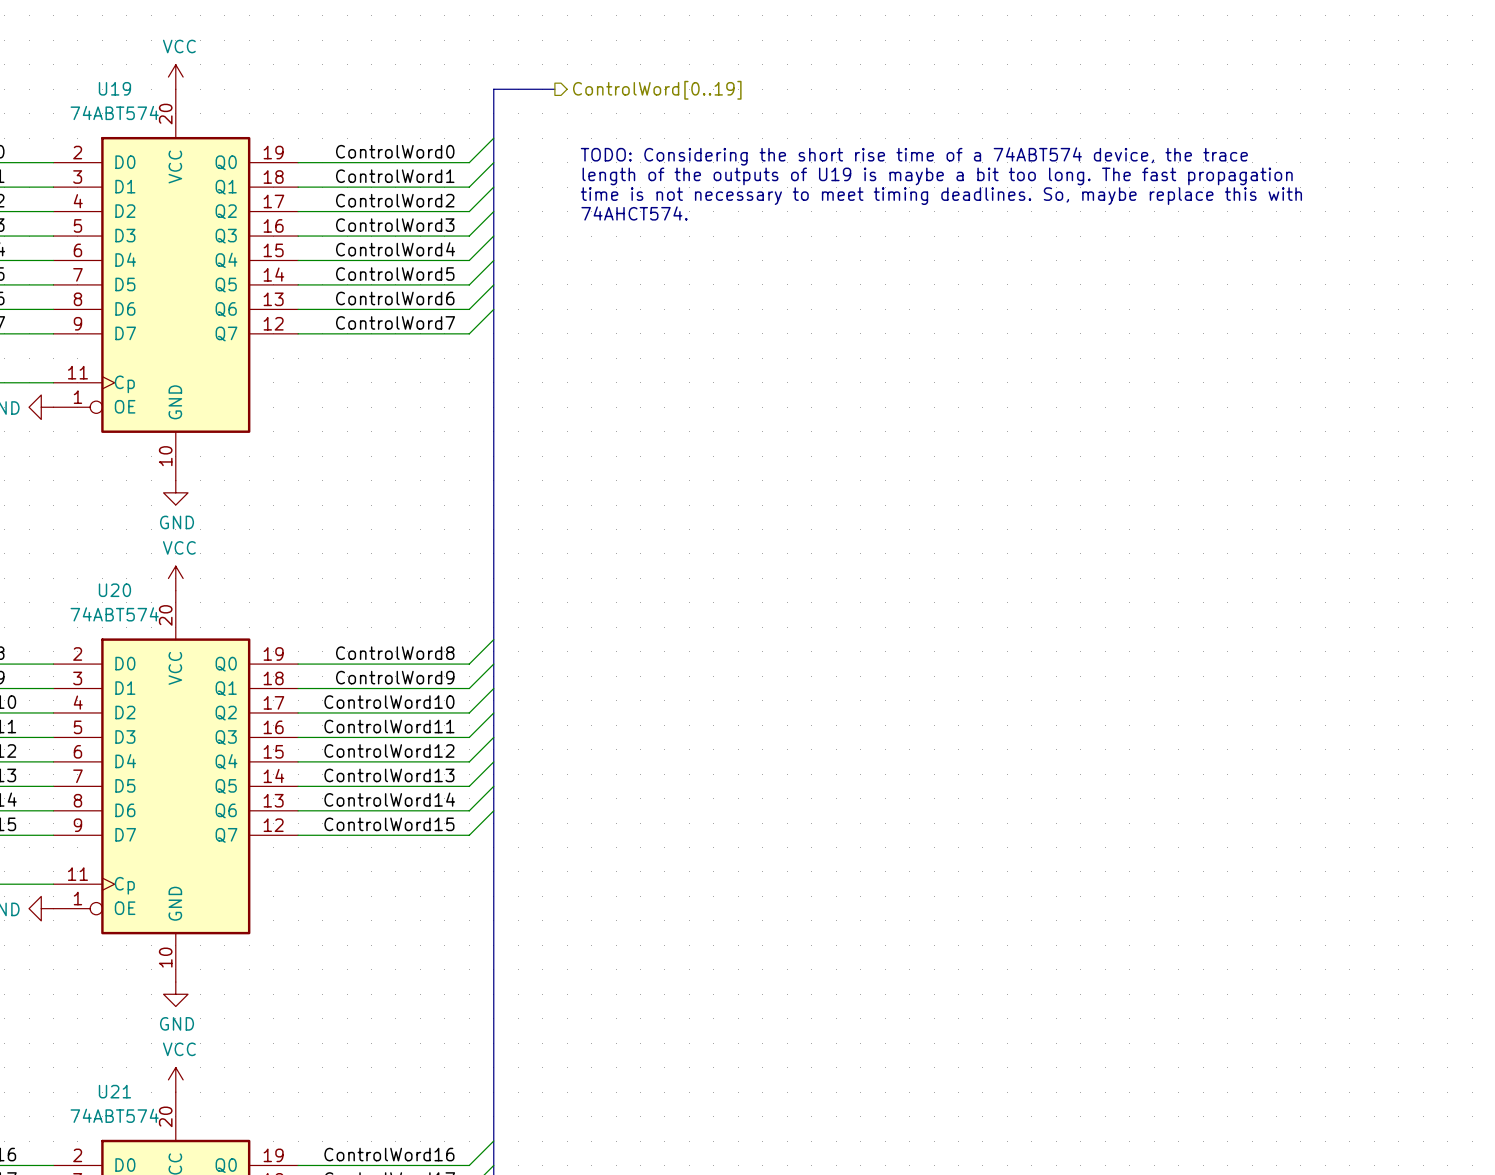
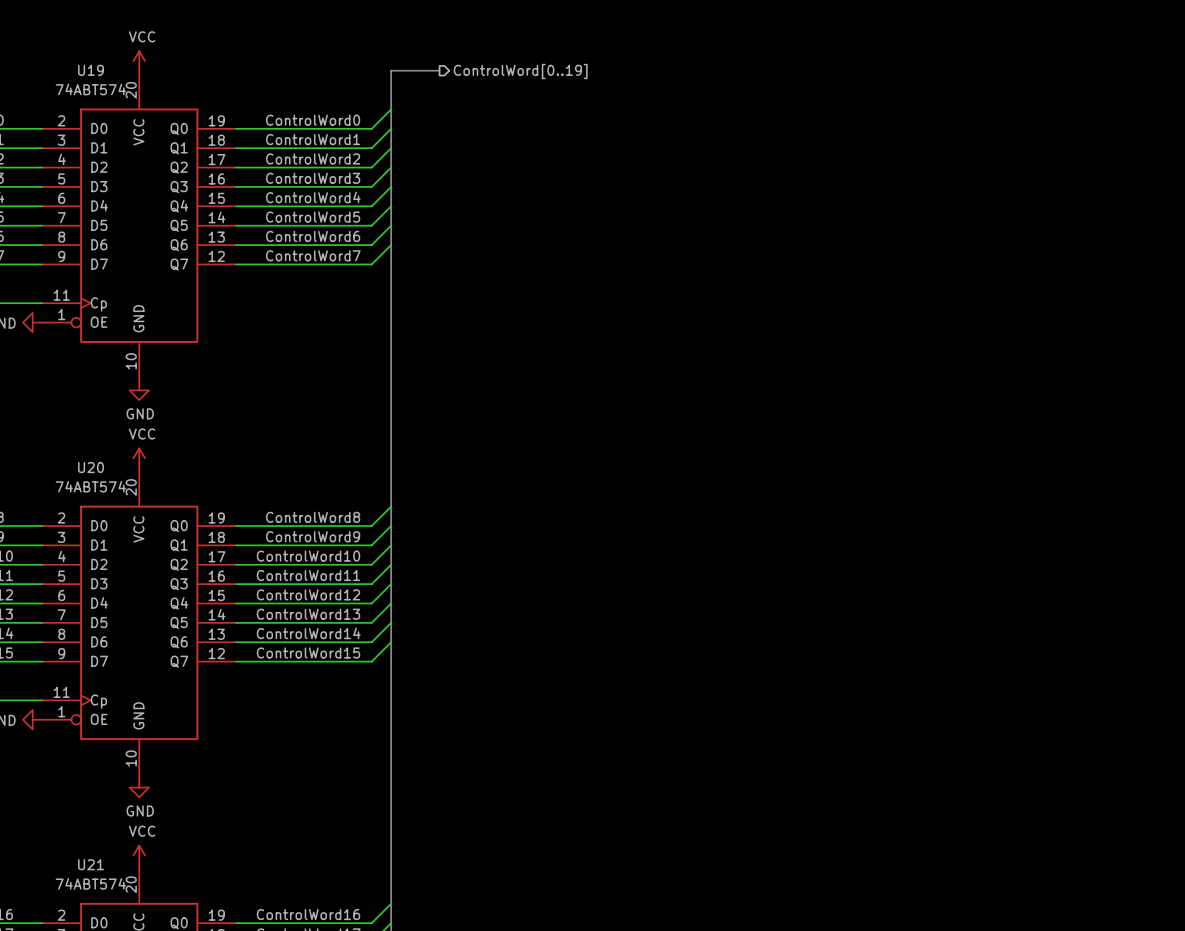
text: TODO: Considering the short rise time of a 74ABT574 device, the trace (914, 156) -> none
text: length of the outputs of U19 is maybe a bit too long. The fast propagation (937, 176) -> none
text: time is not necessary to meet timing deadlines. So, maybe replace this with (941, 196) -> none
text: 74AHCT574. (634, 213) -> none

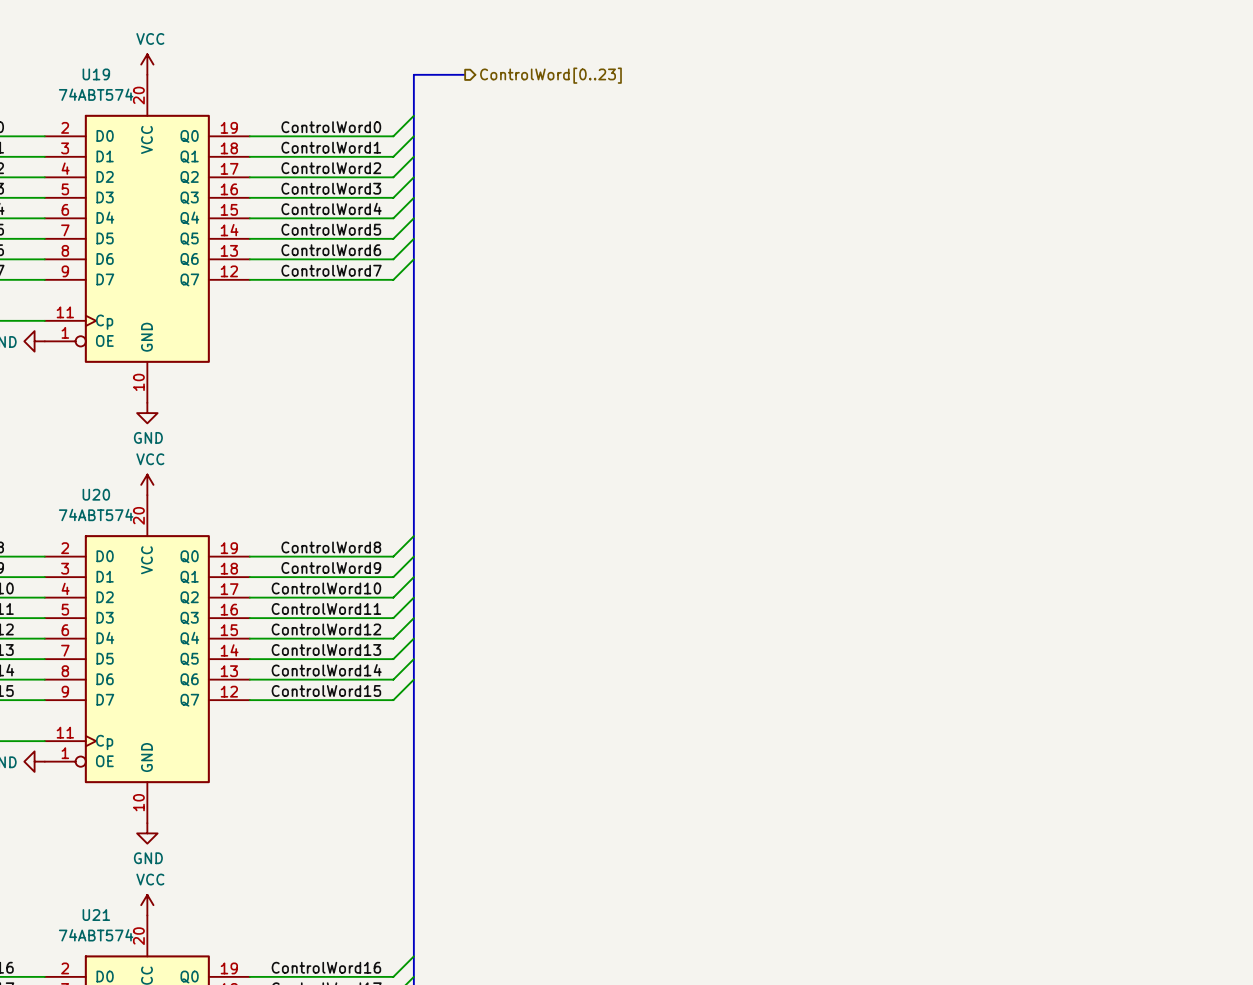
hierarchical label: ControlWord[0..19] (520, 71) -> ControlWord[0..23] (550, 75)

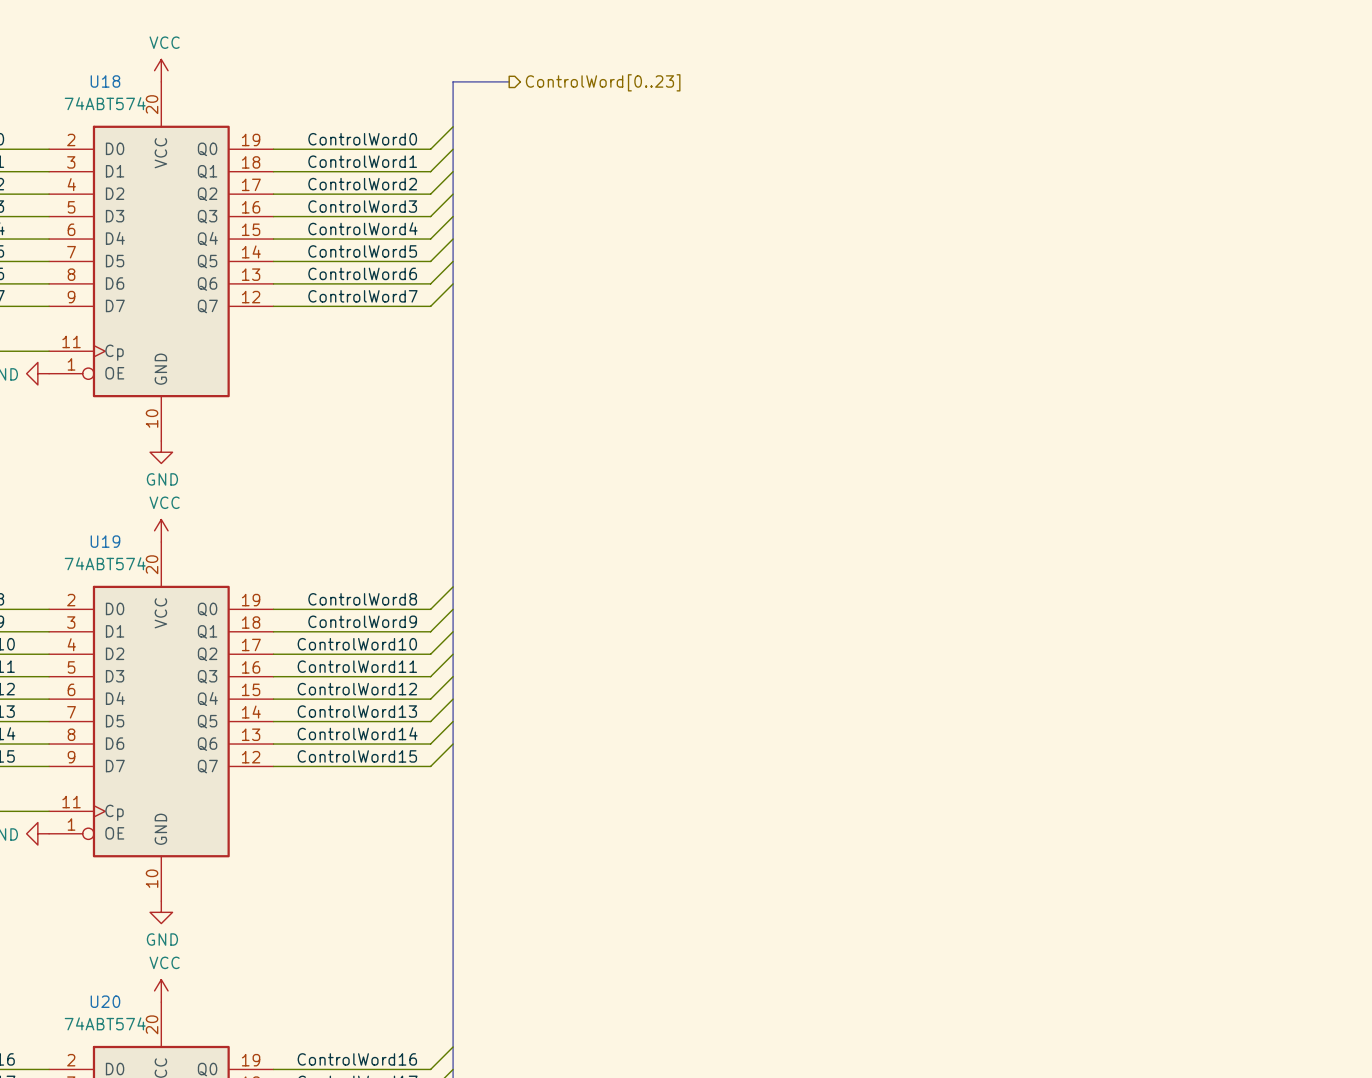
U19 name: U19 (96, 74) -> U18 (105, 81)
U20 name: U20 (96, 494) -> U19 (105, 541)
U21 name: U21 (96, 915) -> U20 (105, 1001)

